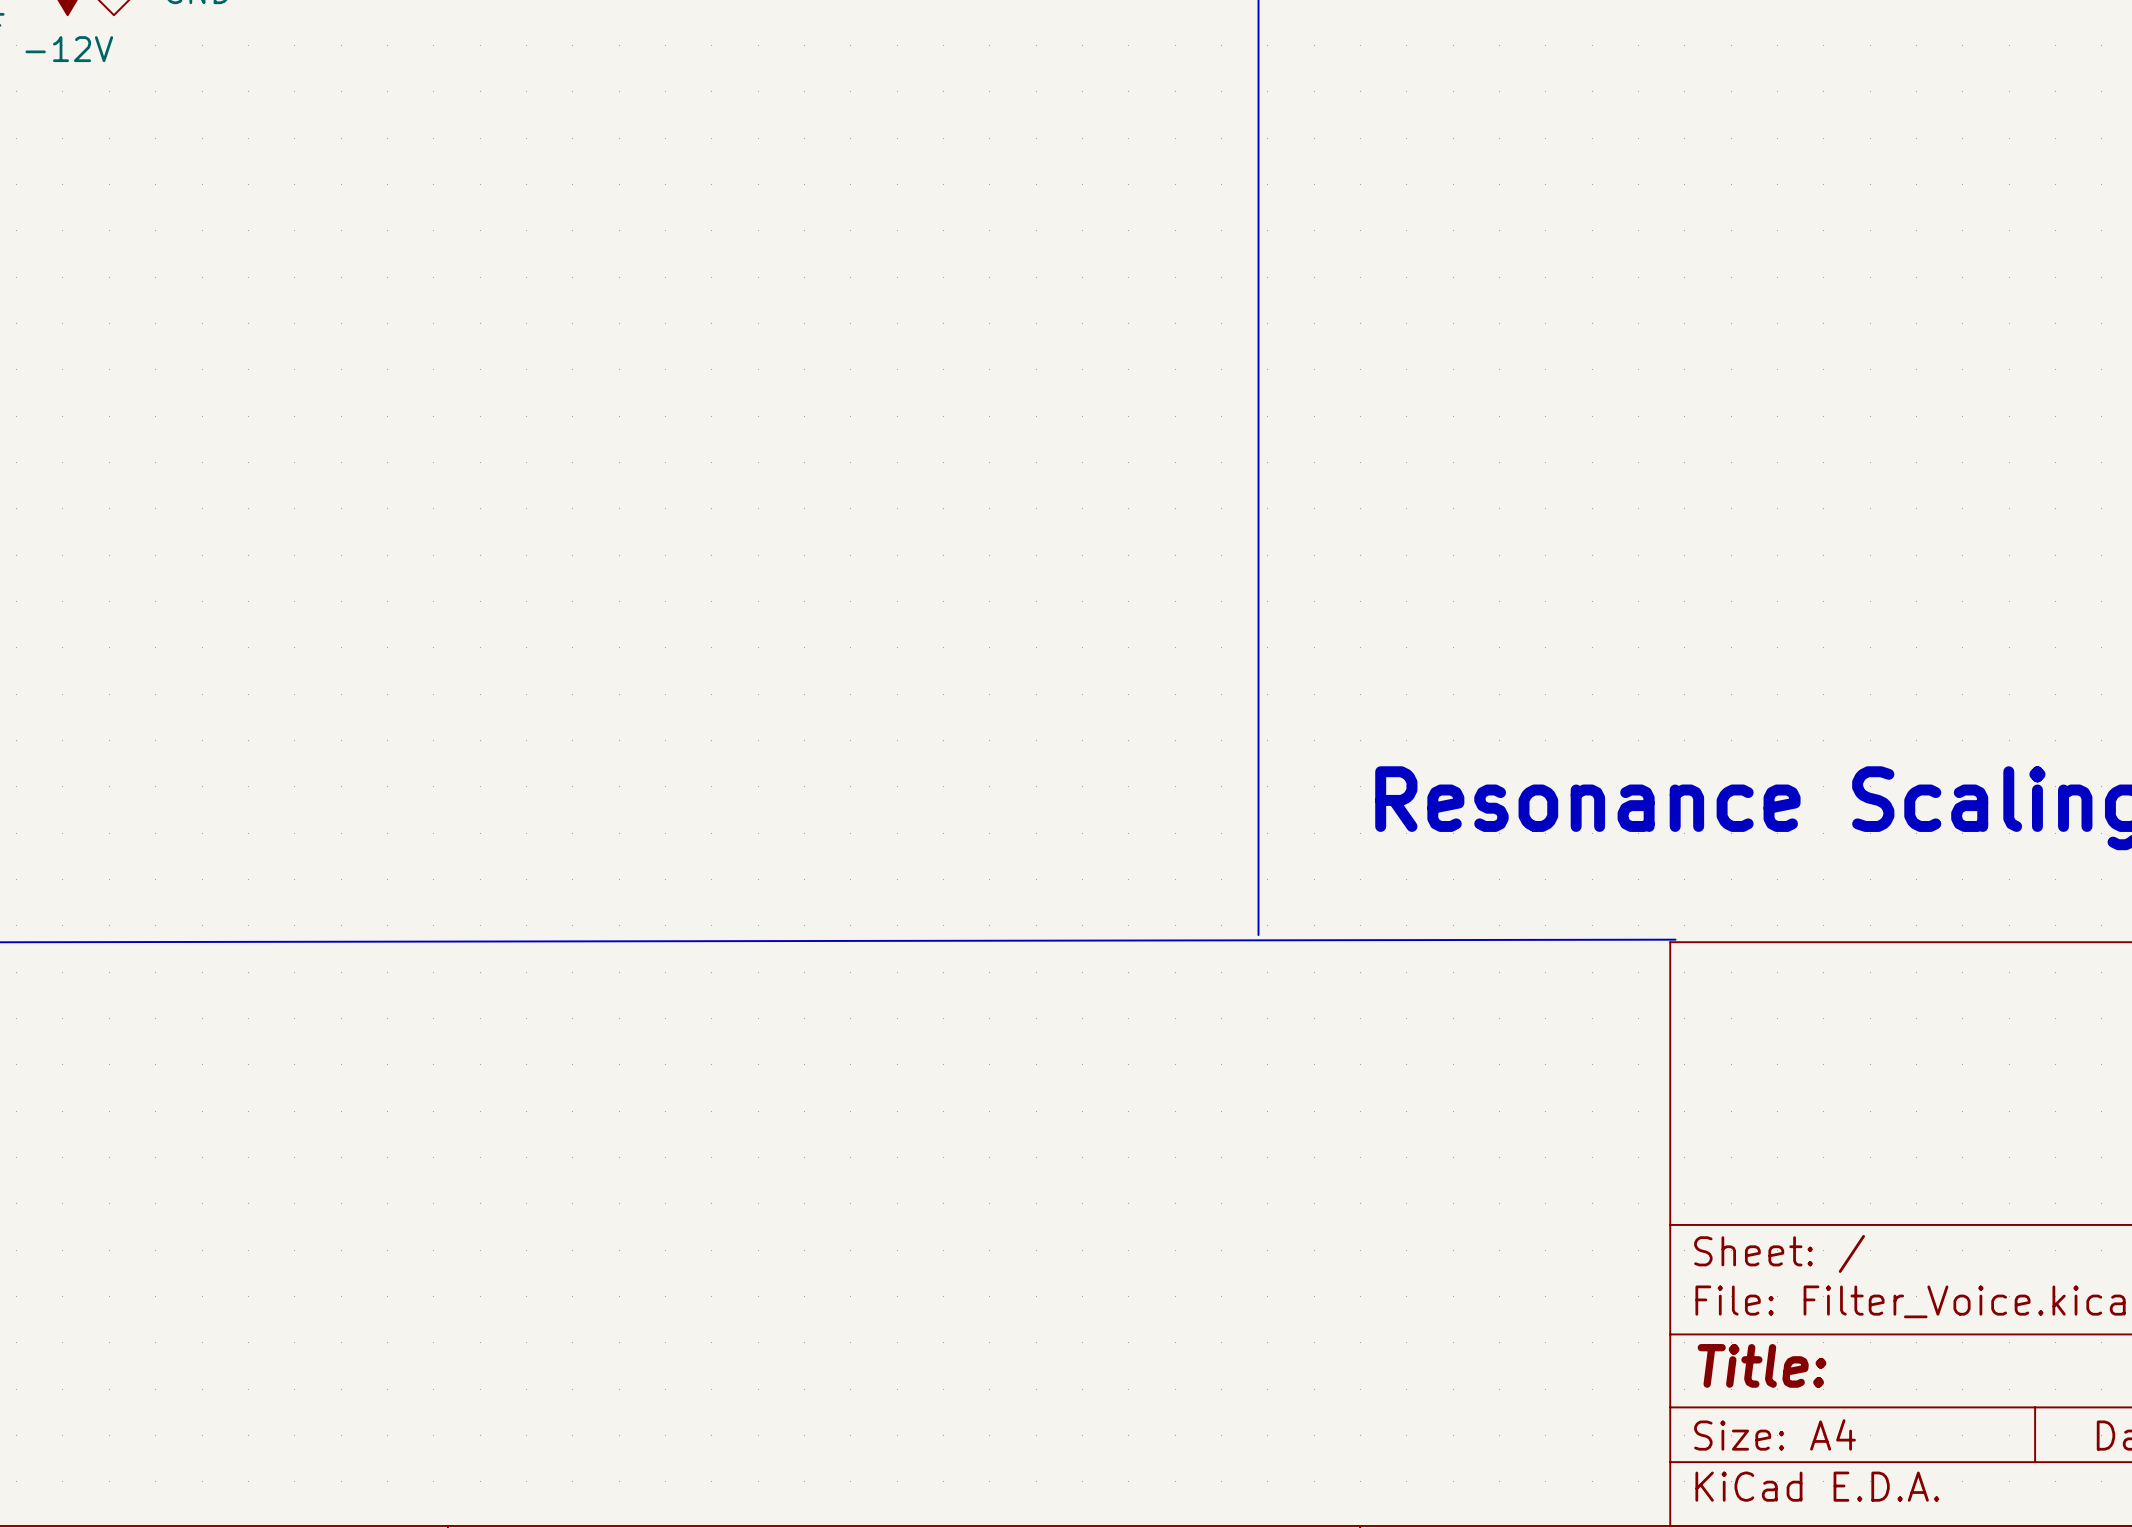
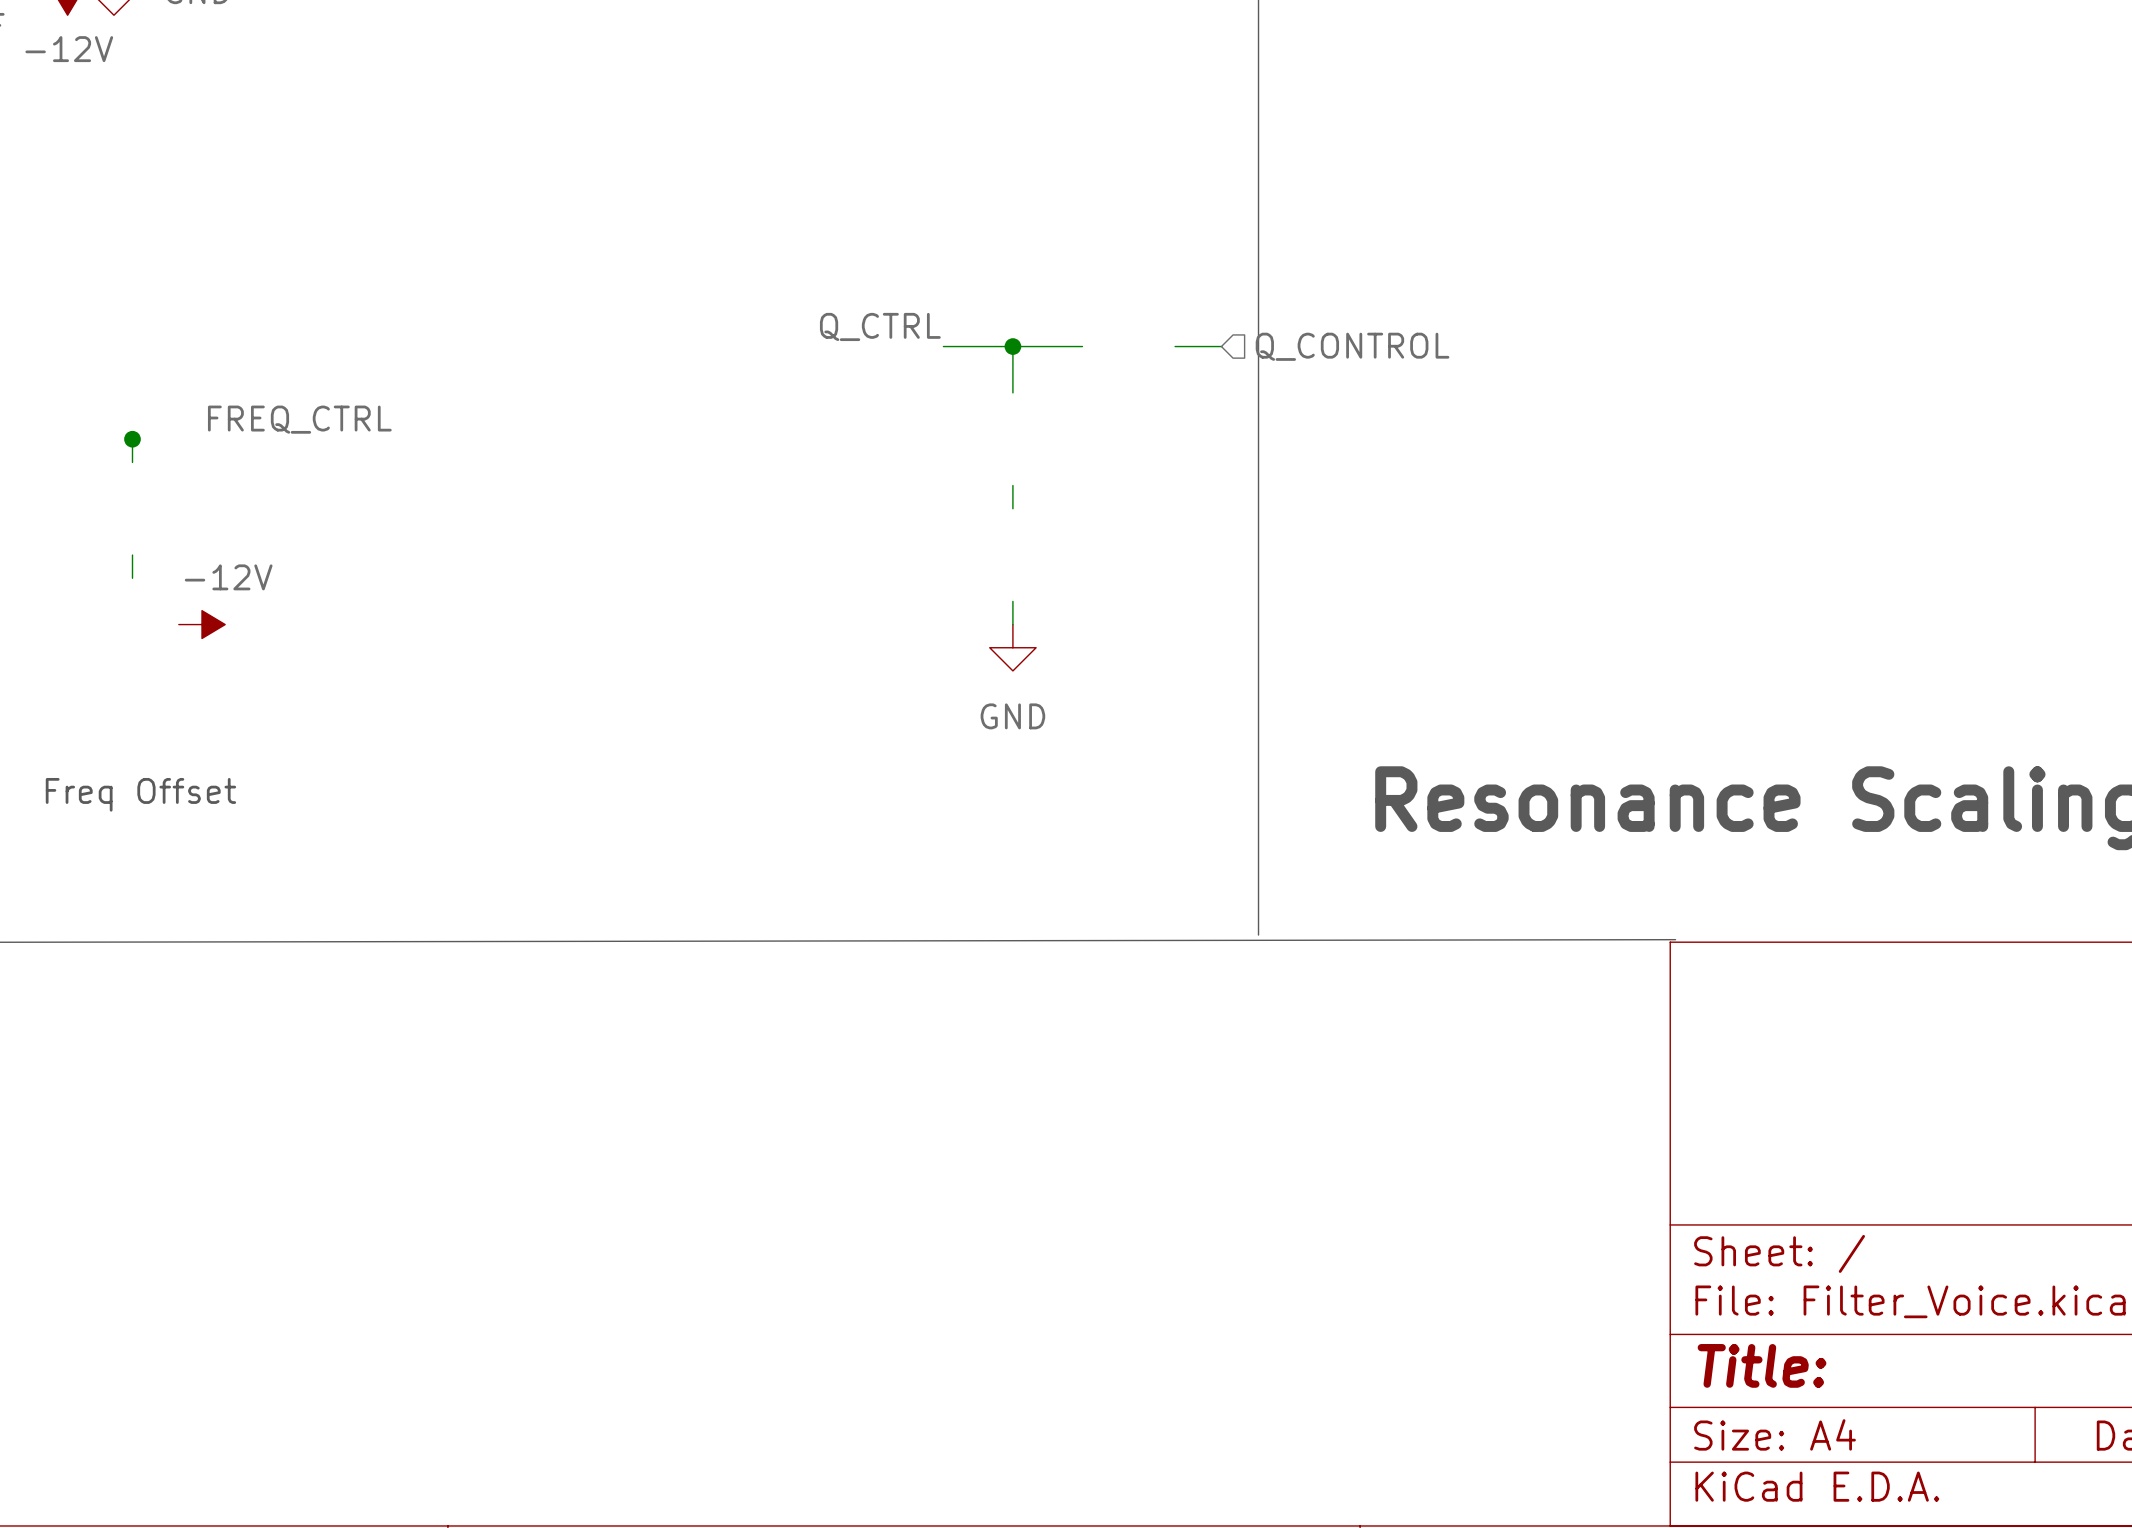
label: none -> Q_CTRL (880, 326)
wire: none -> (943, 346) (1082, 346)
wire: none -> (1012, 346) (1012, 392)
junction: none -> (1012, 346)
wire: none -> (1175, 346) (1221, 346)
hierarchical label: none -> Q_CONTROL (1352, 346)
label: none -> FREQ_CTRL (299, 419)
wire: none -> (132, 439) (132, 462)
junction: none -> (132, 439)
wire: none -> (1012, 485) (1012, 508)
wire: none -> (132, 555) (132, 578)
wire: none -> (1012, 601) (1012, 624)
power symbol: none -> -12V (202, 624)
power symbol: none -> GND (1012, 647)
text: none -> Freq Offset (140, 794)

